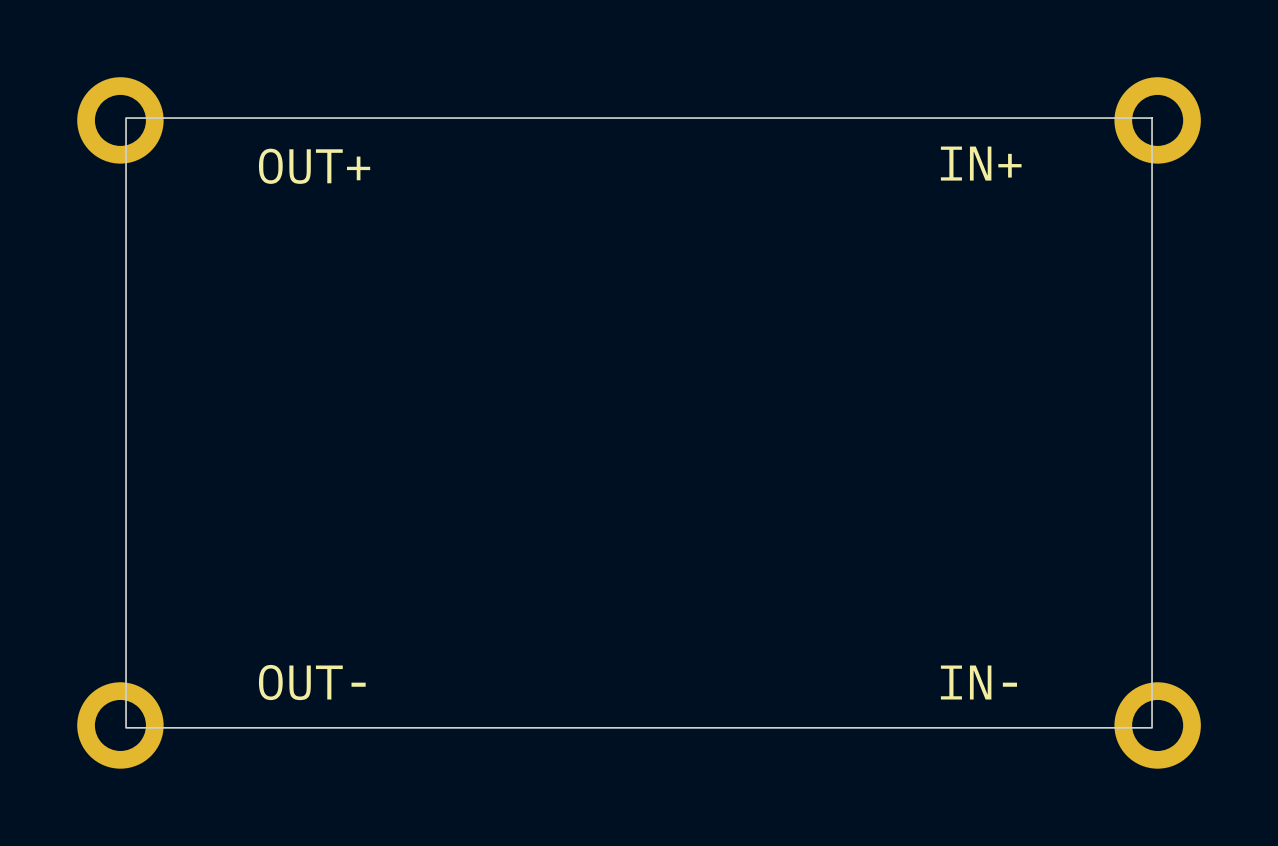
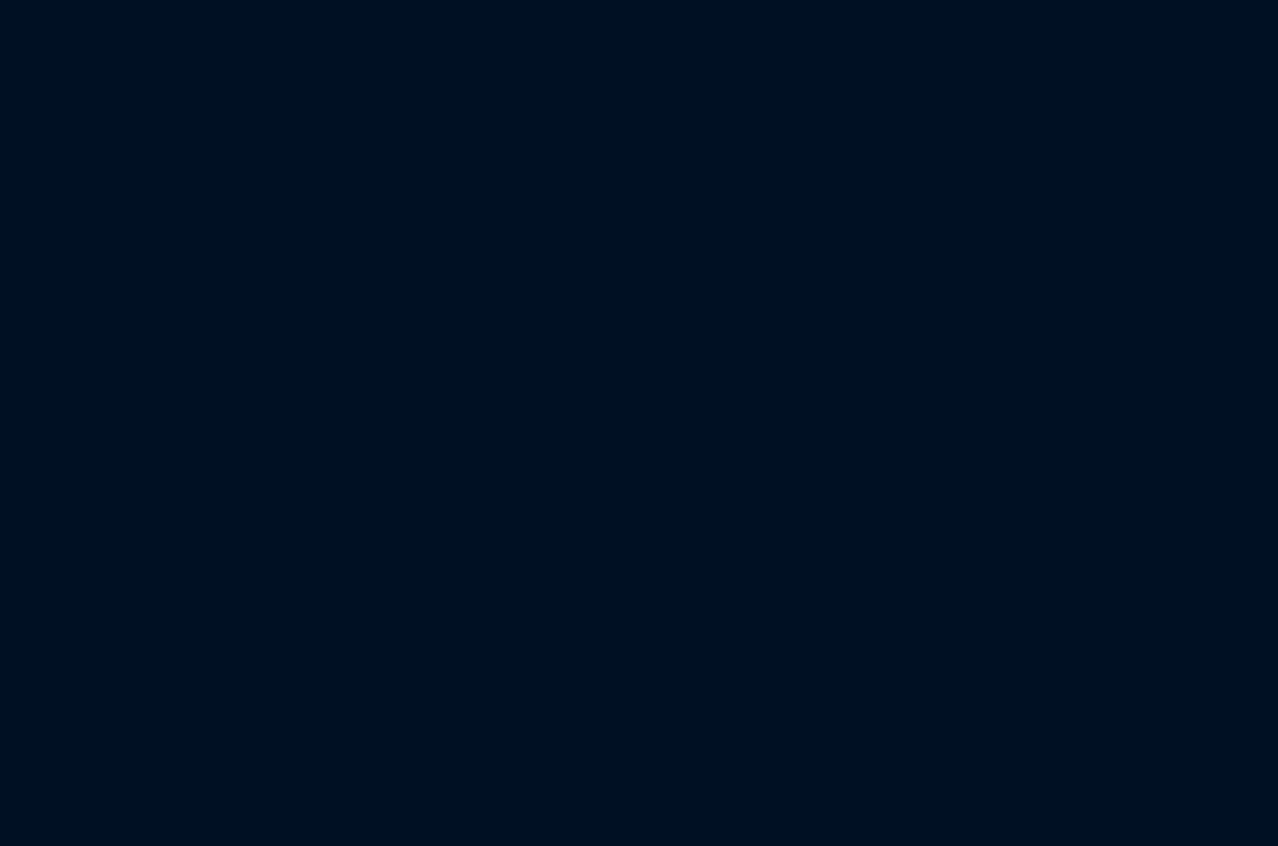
part: (639, 422) -> none

